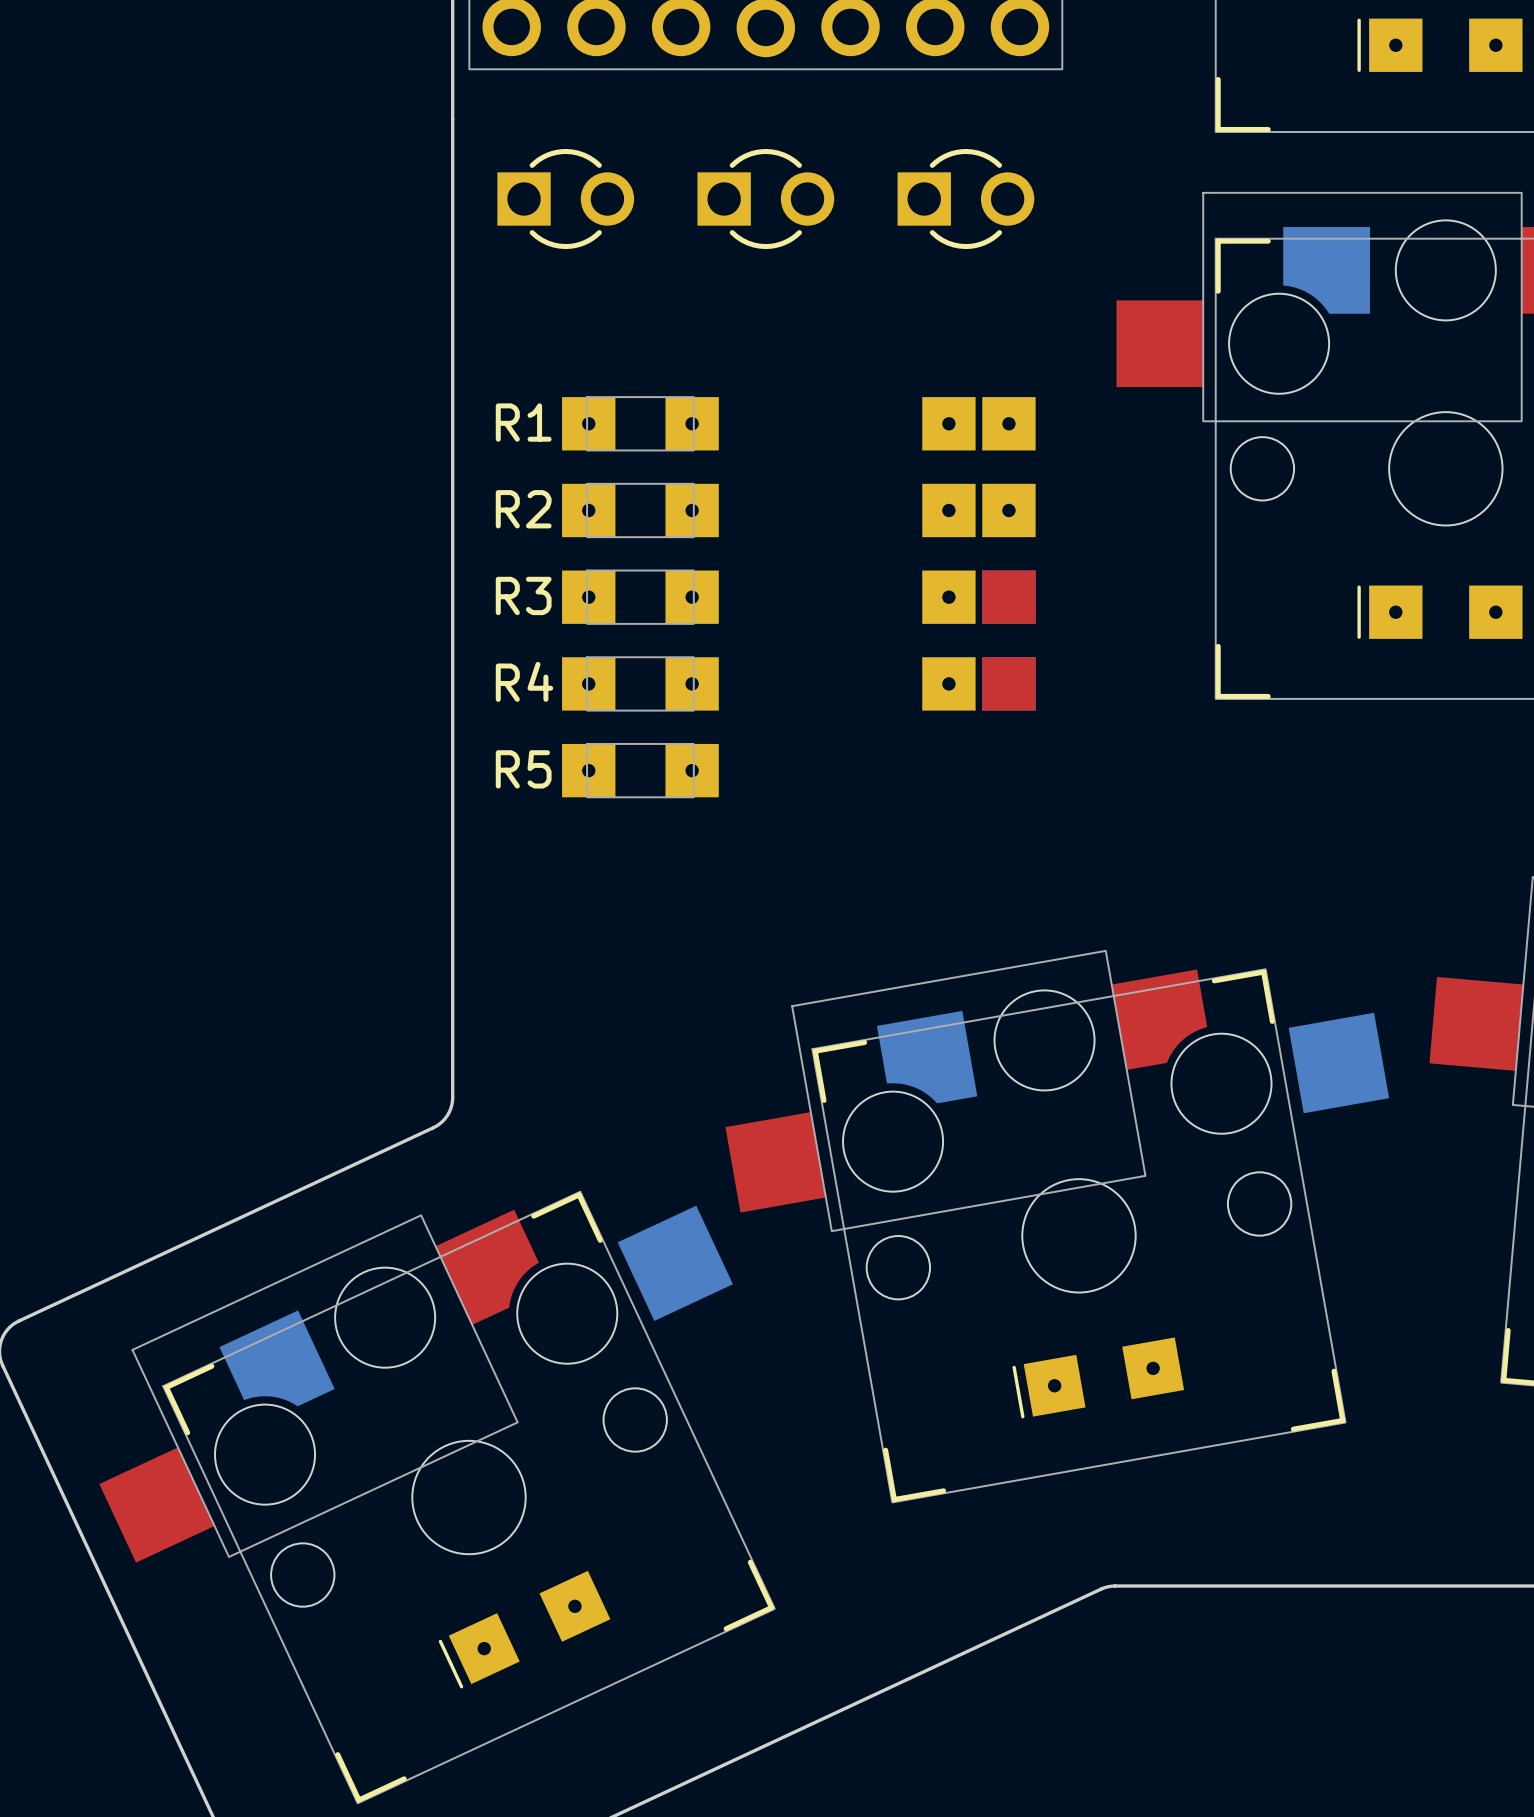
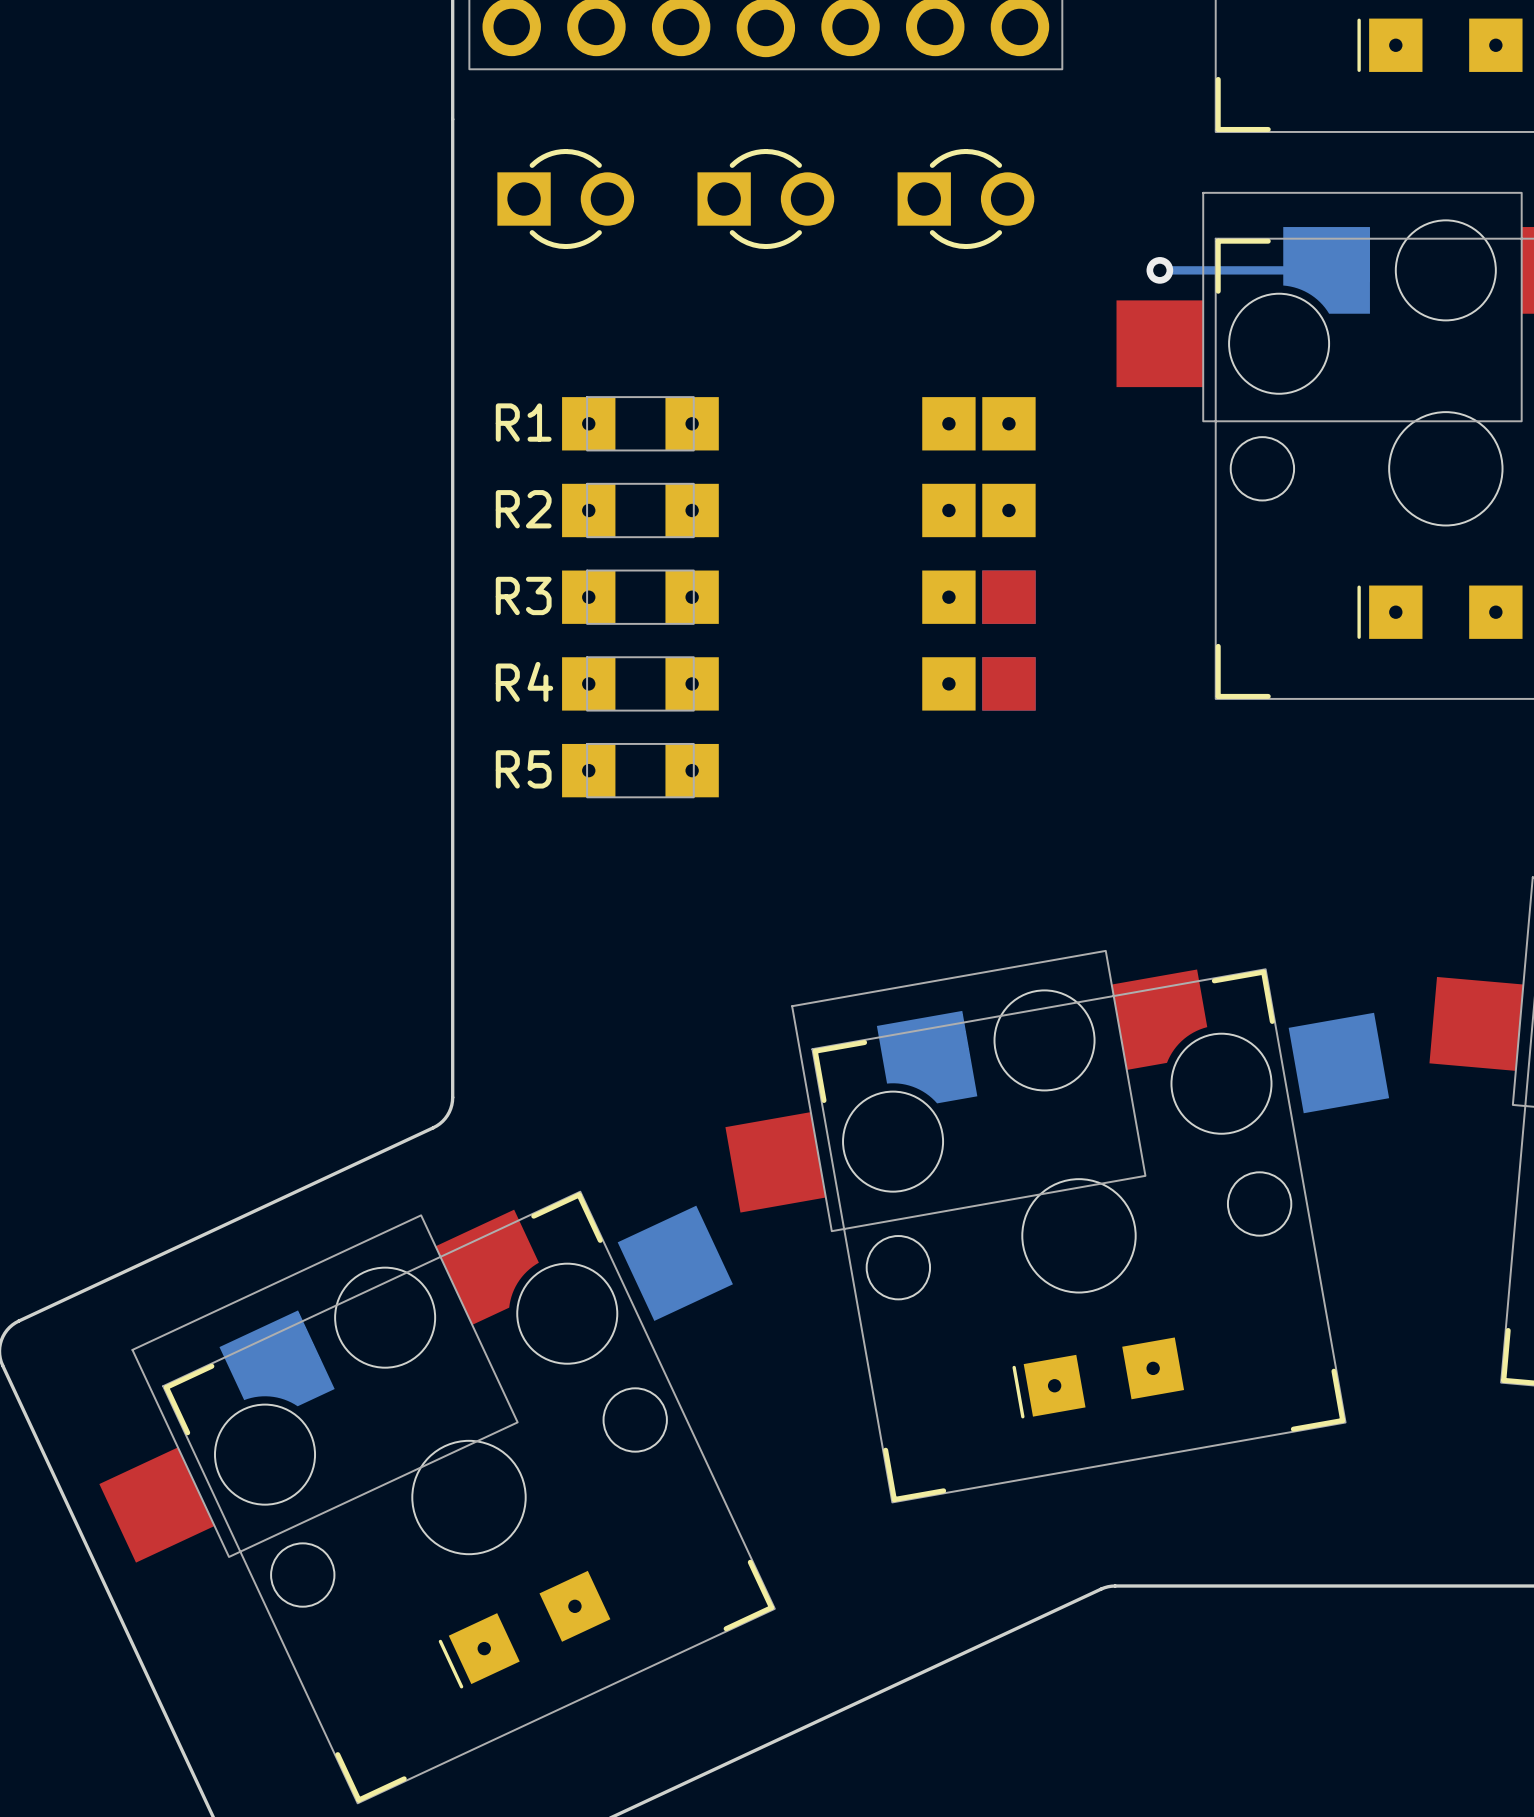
bottom track: none -> (1159, 270) (1326, 270)
via: none -> (1159, 270)

